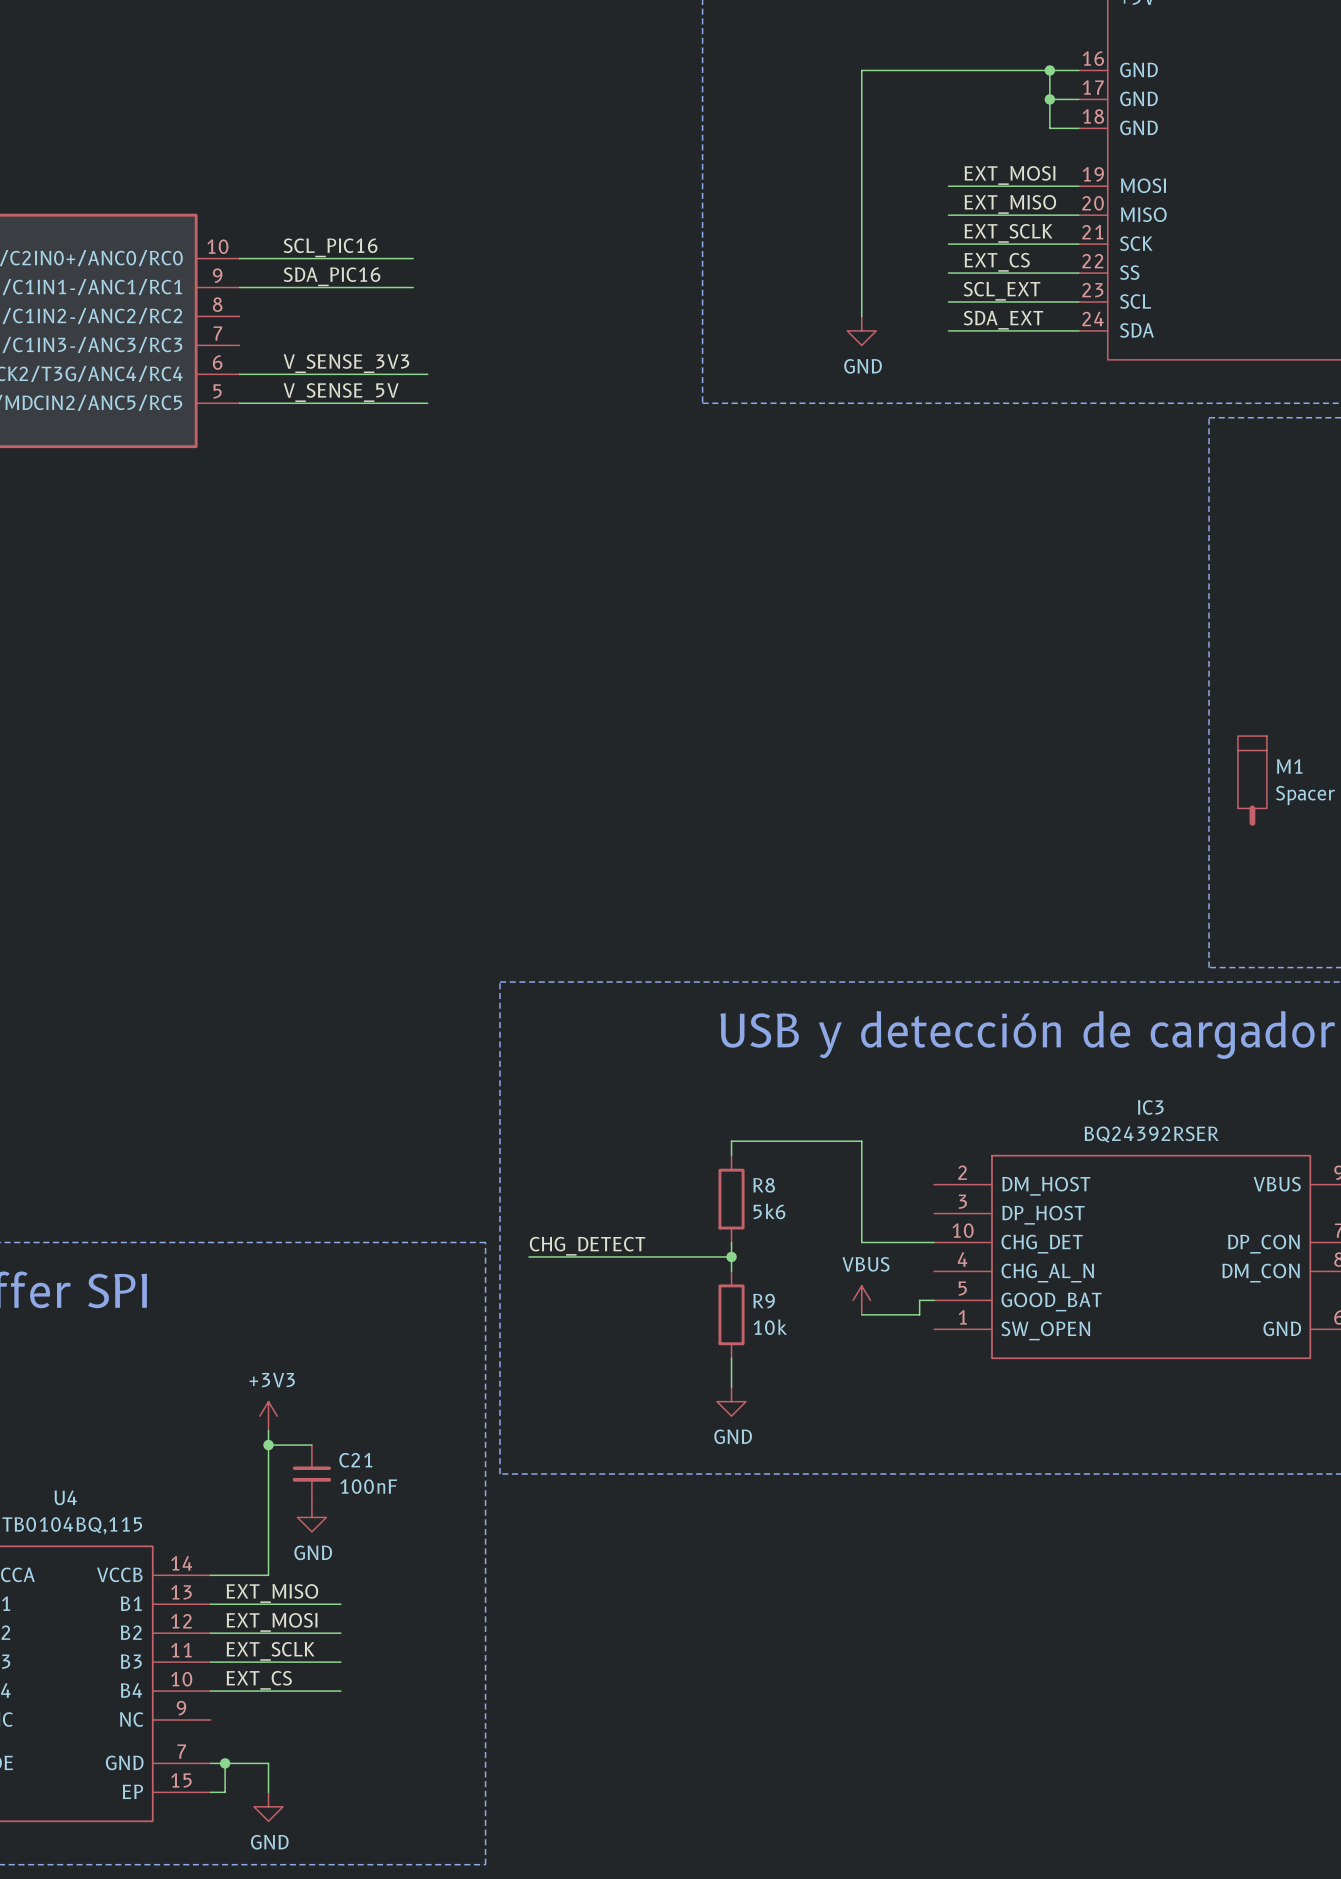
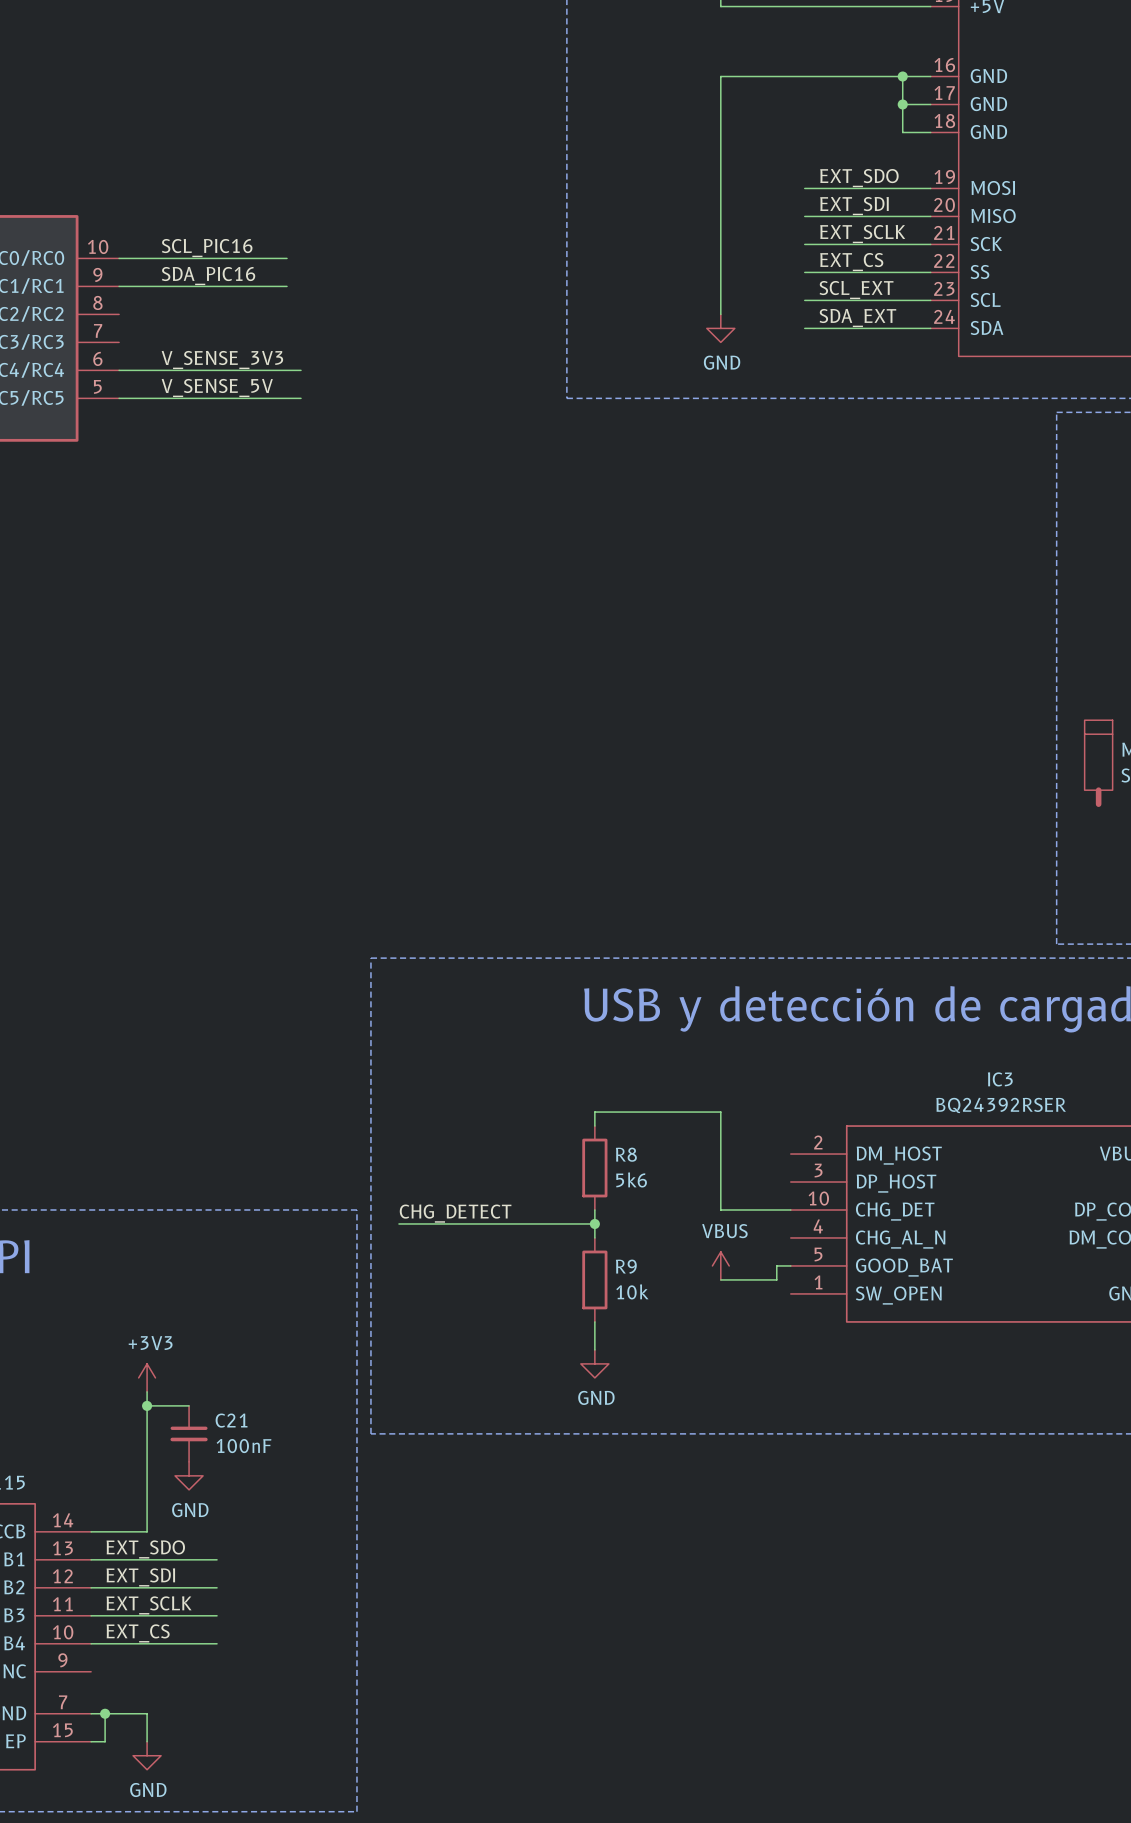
label: EXT_MOSI (1009, 175) -> EXT_SDO (859, 178)
label: EXT_MISO (1010, 204) -> EXT_SDI (854, 206)
label: EXT_MISO (272, 1593) -> EXT_SDO (145, 1549)
label: EXT_MOSI (272, 1622) -> EXT_SDI (140, 1577)

